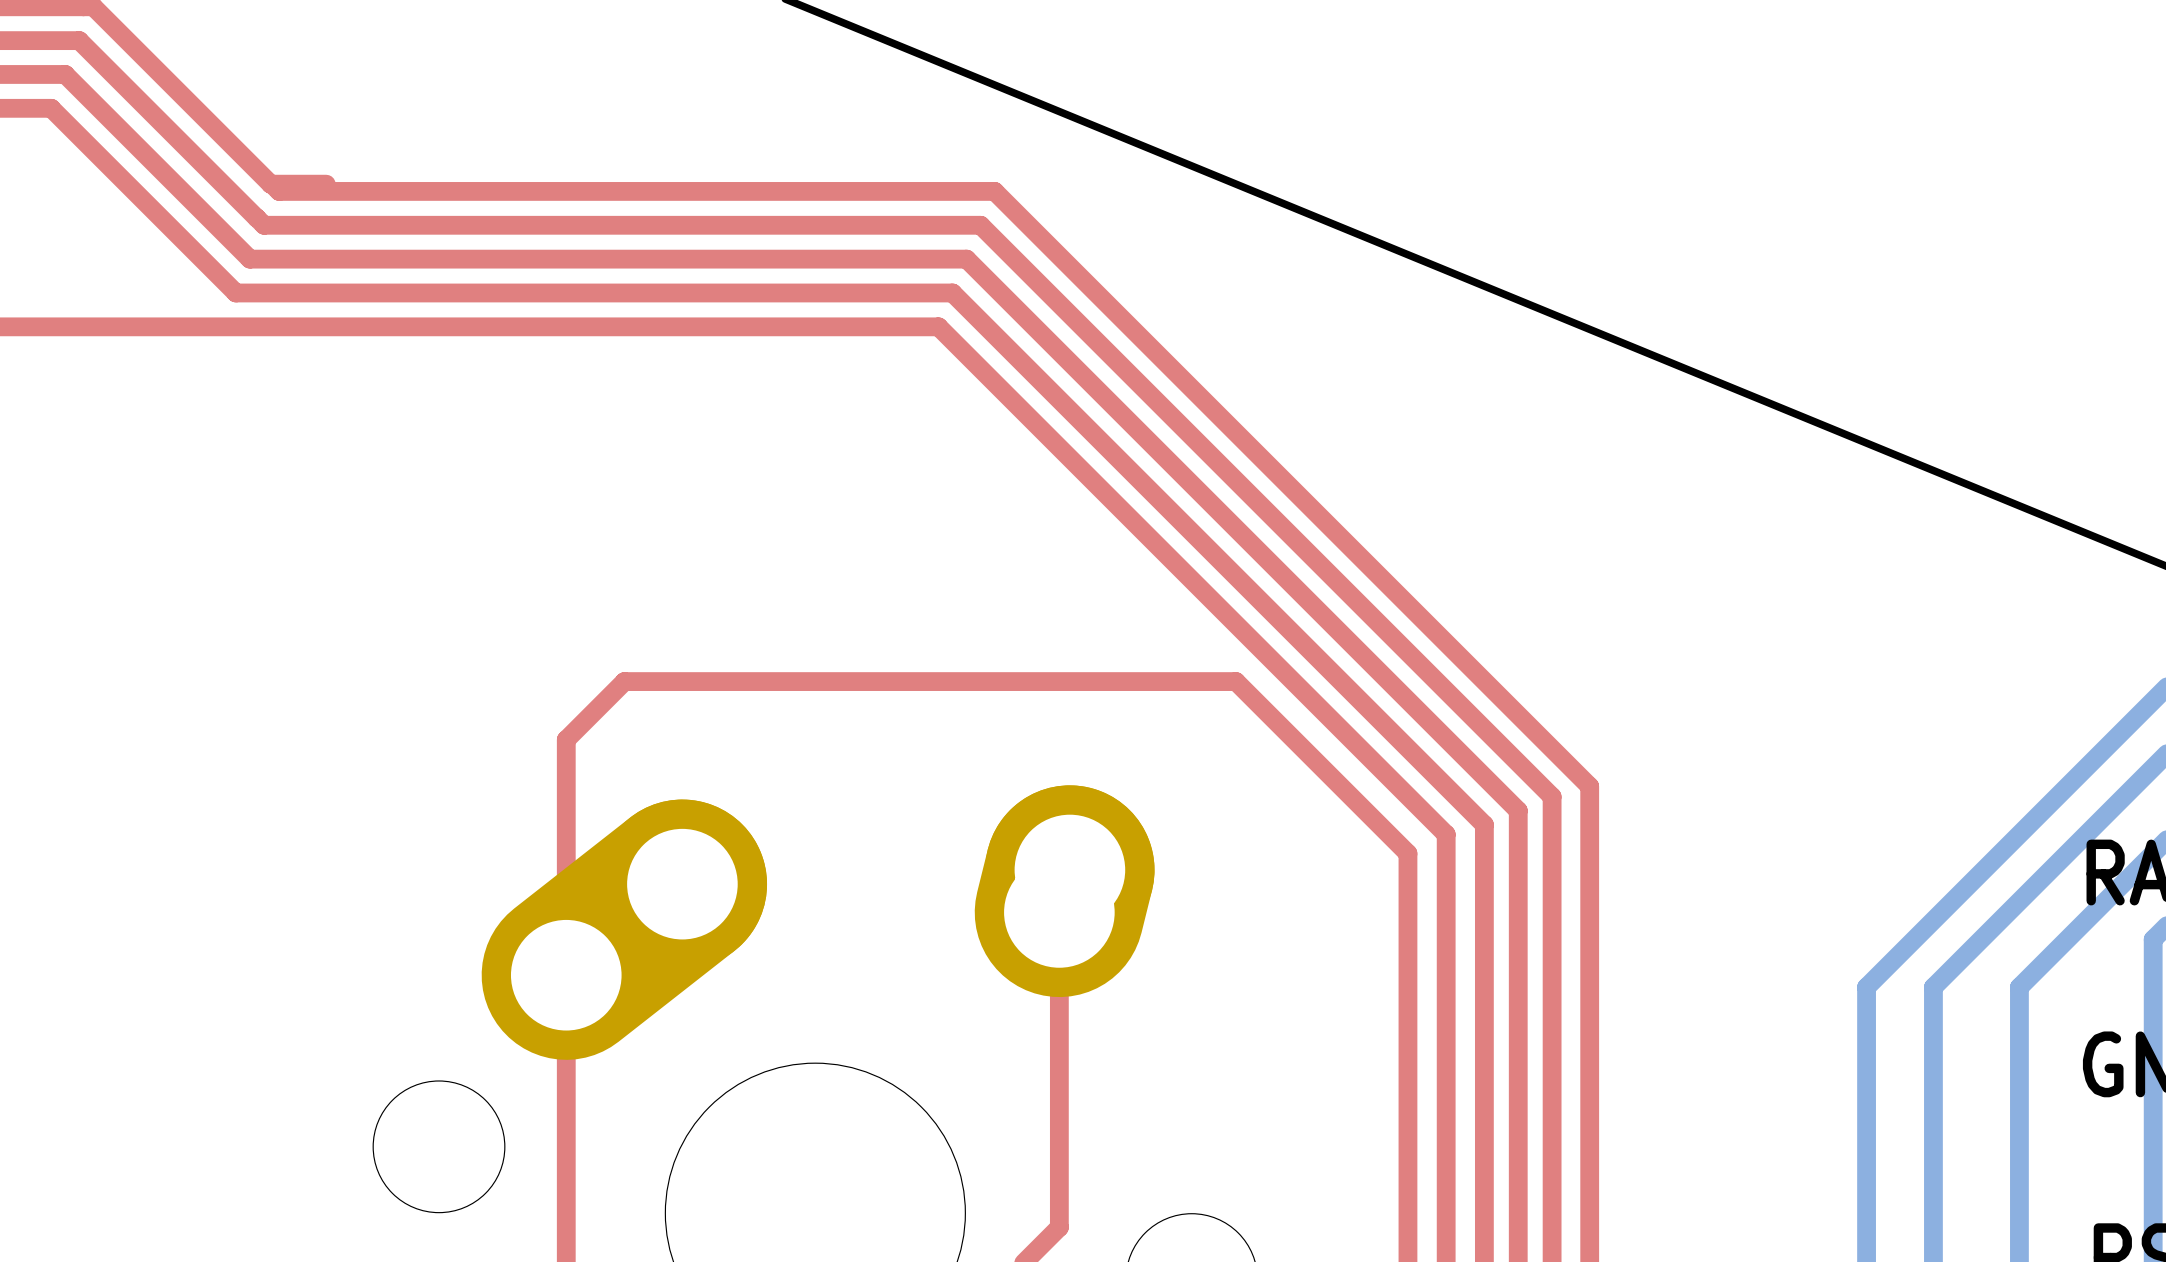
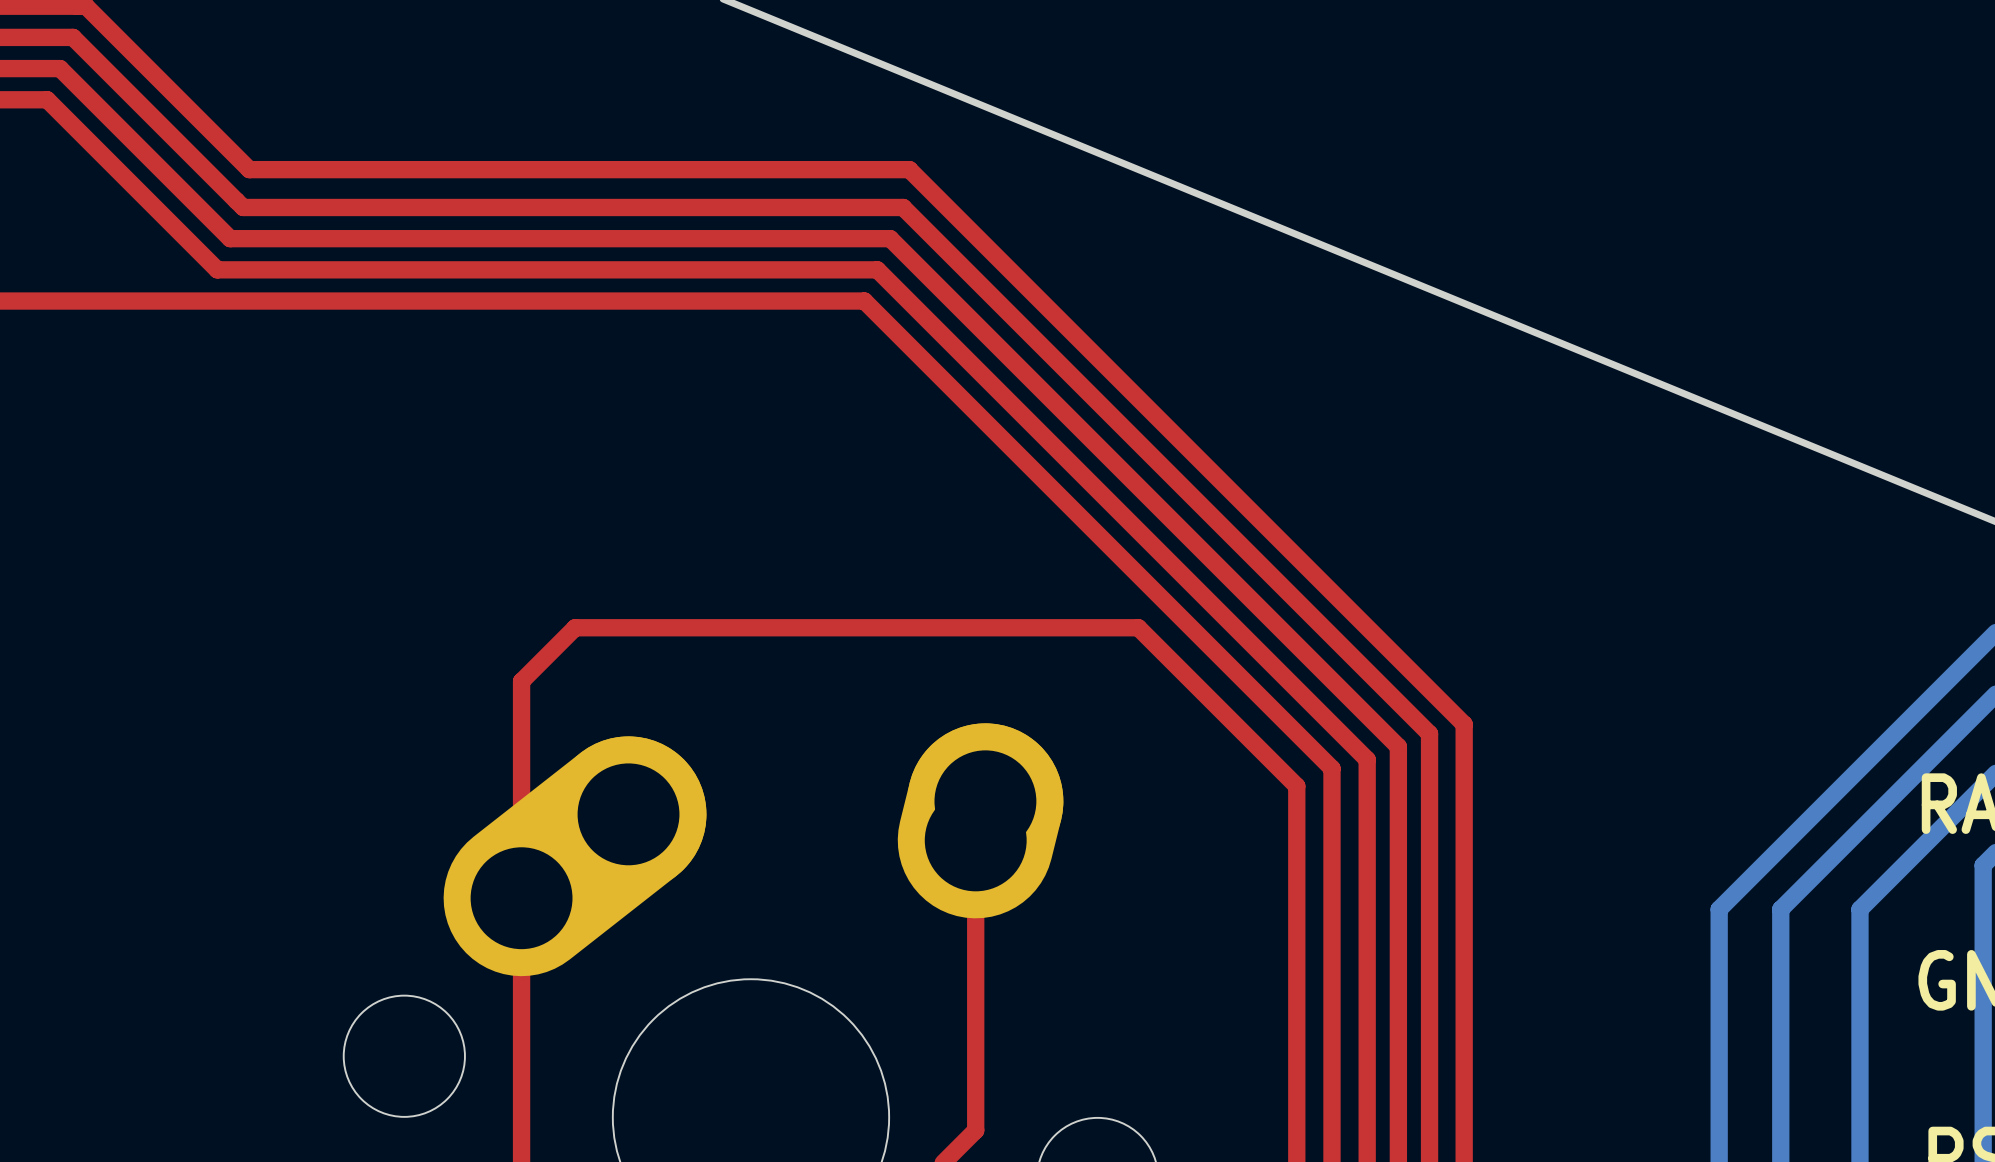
top track: (271, 184) (279, 191) (994, 191) -> (300, 169) (909, 169) (916, 176)

